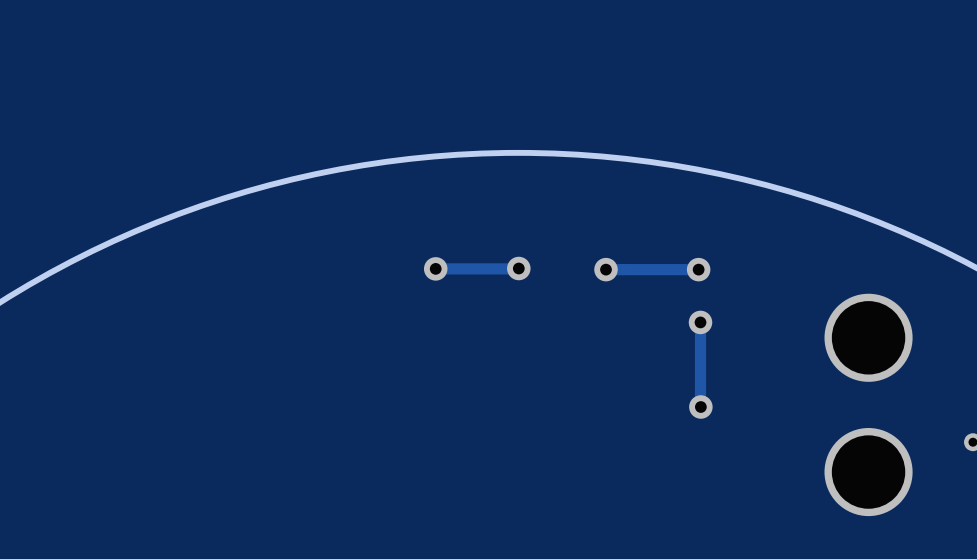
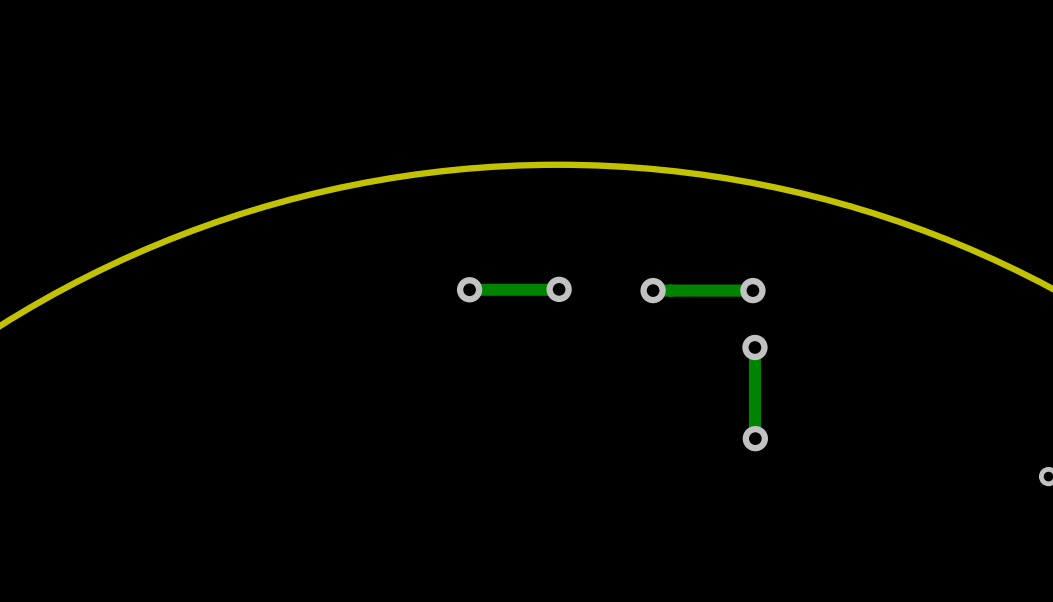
via: (868, 337) -> none
via: (868, 472) -> none

